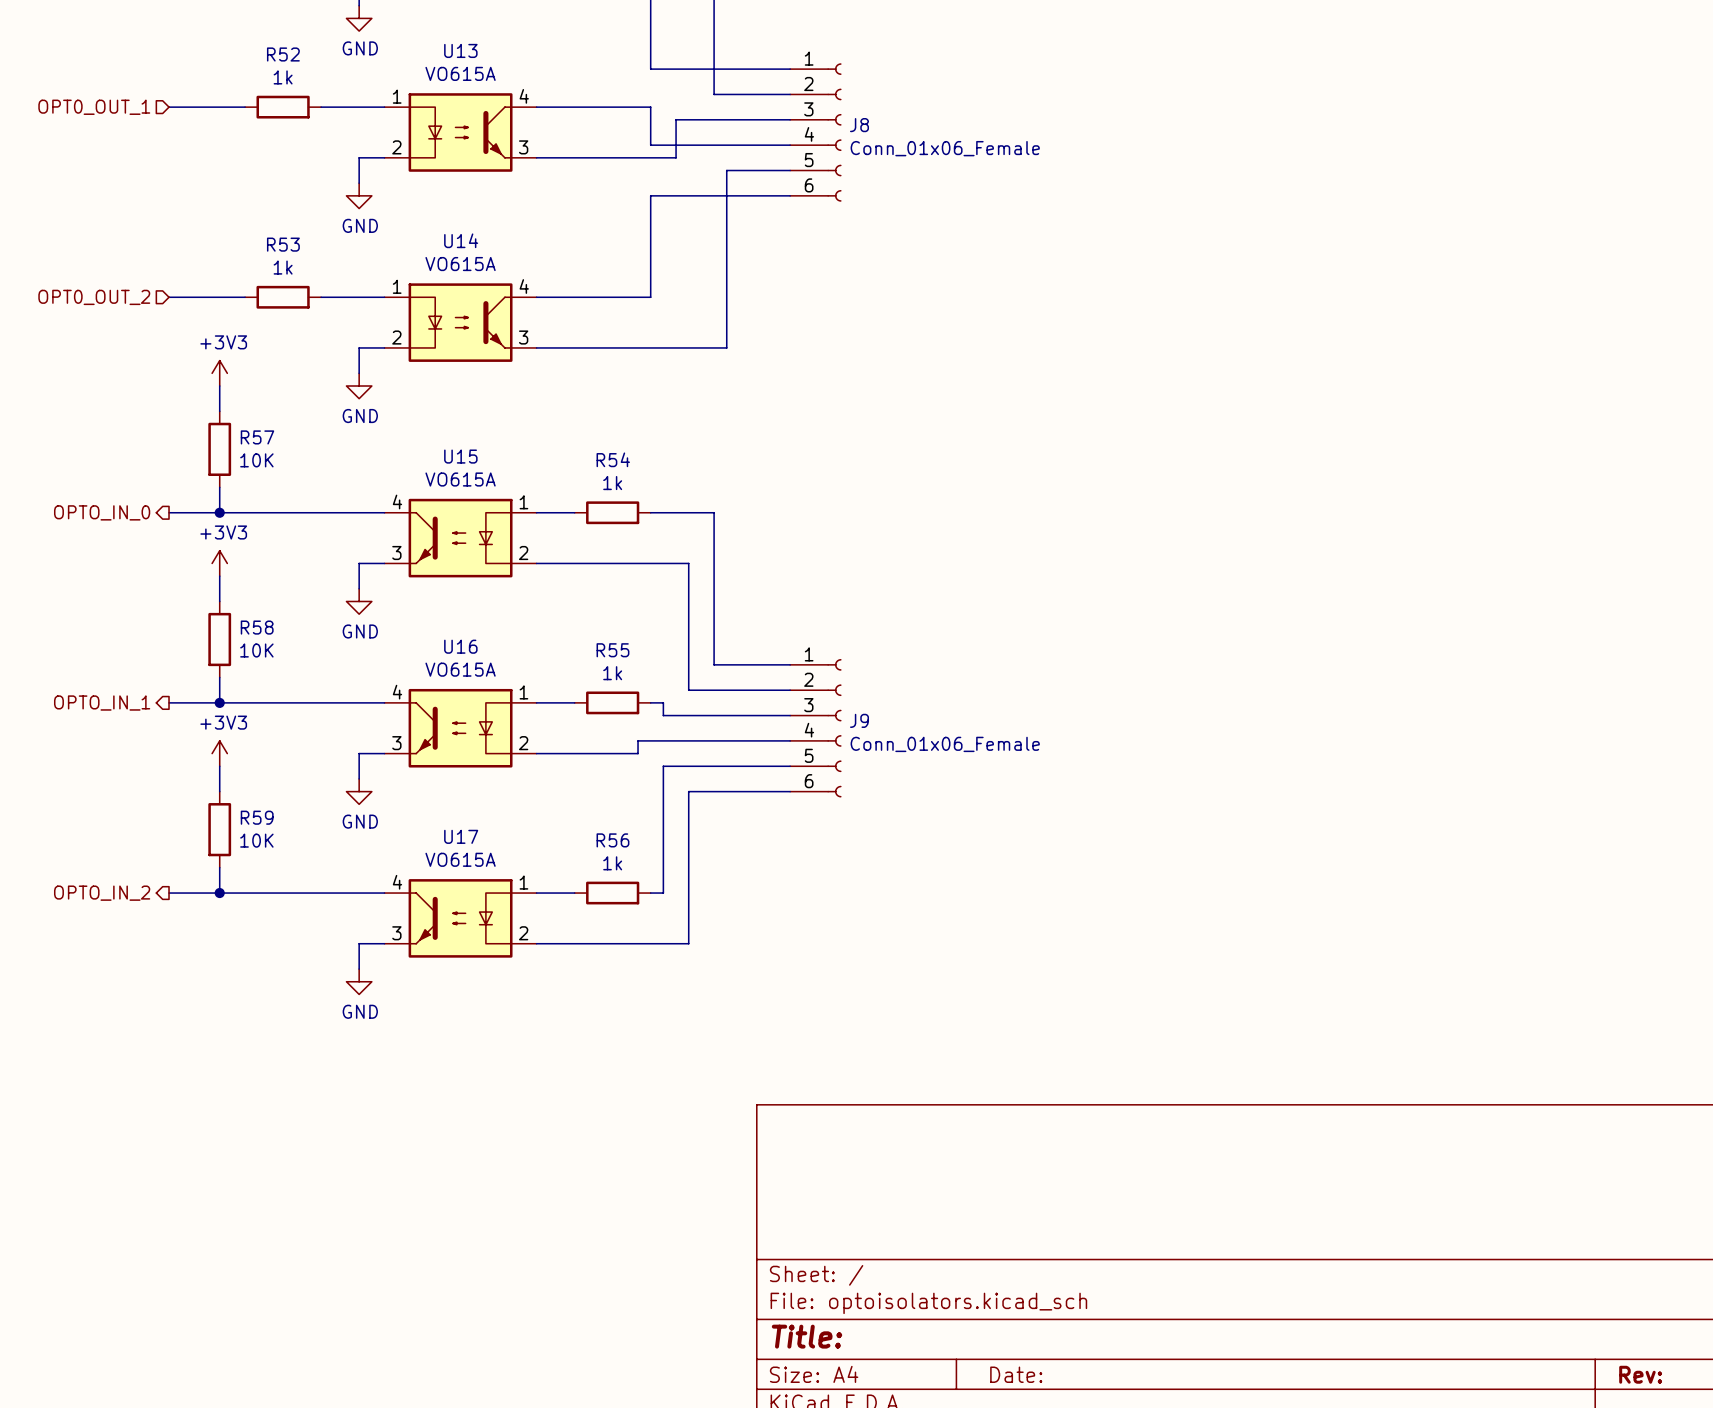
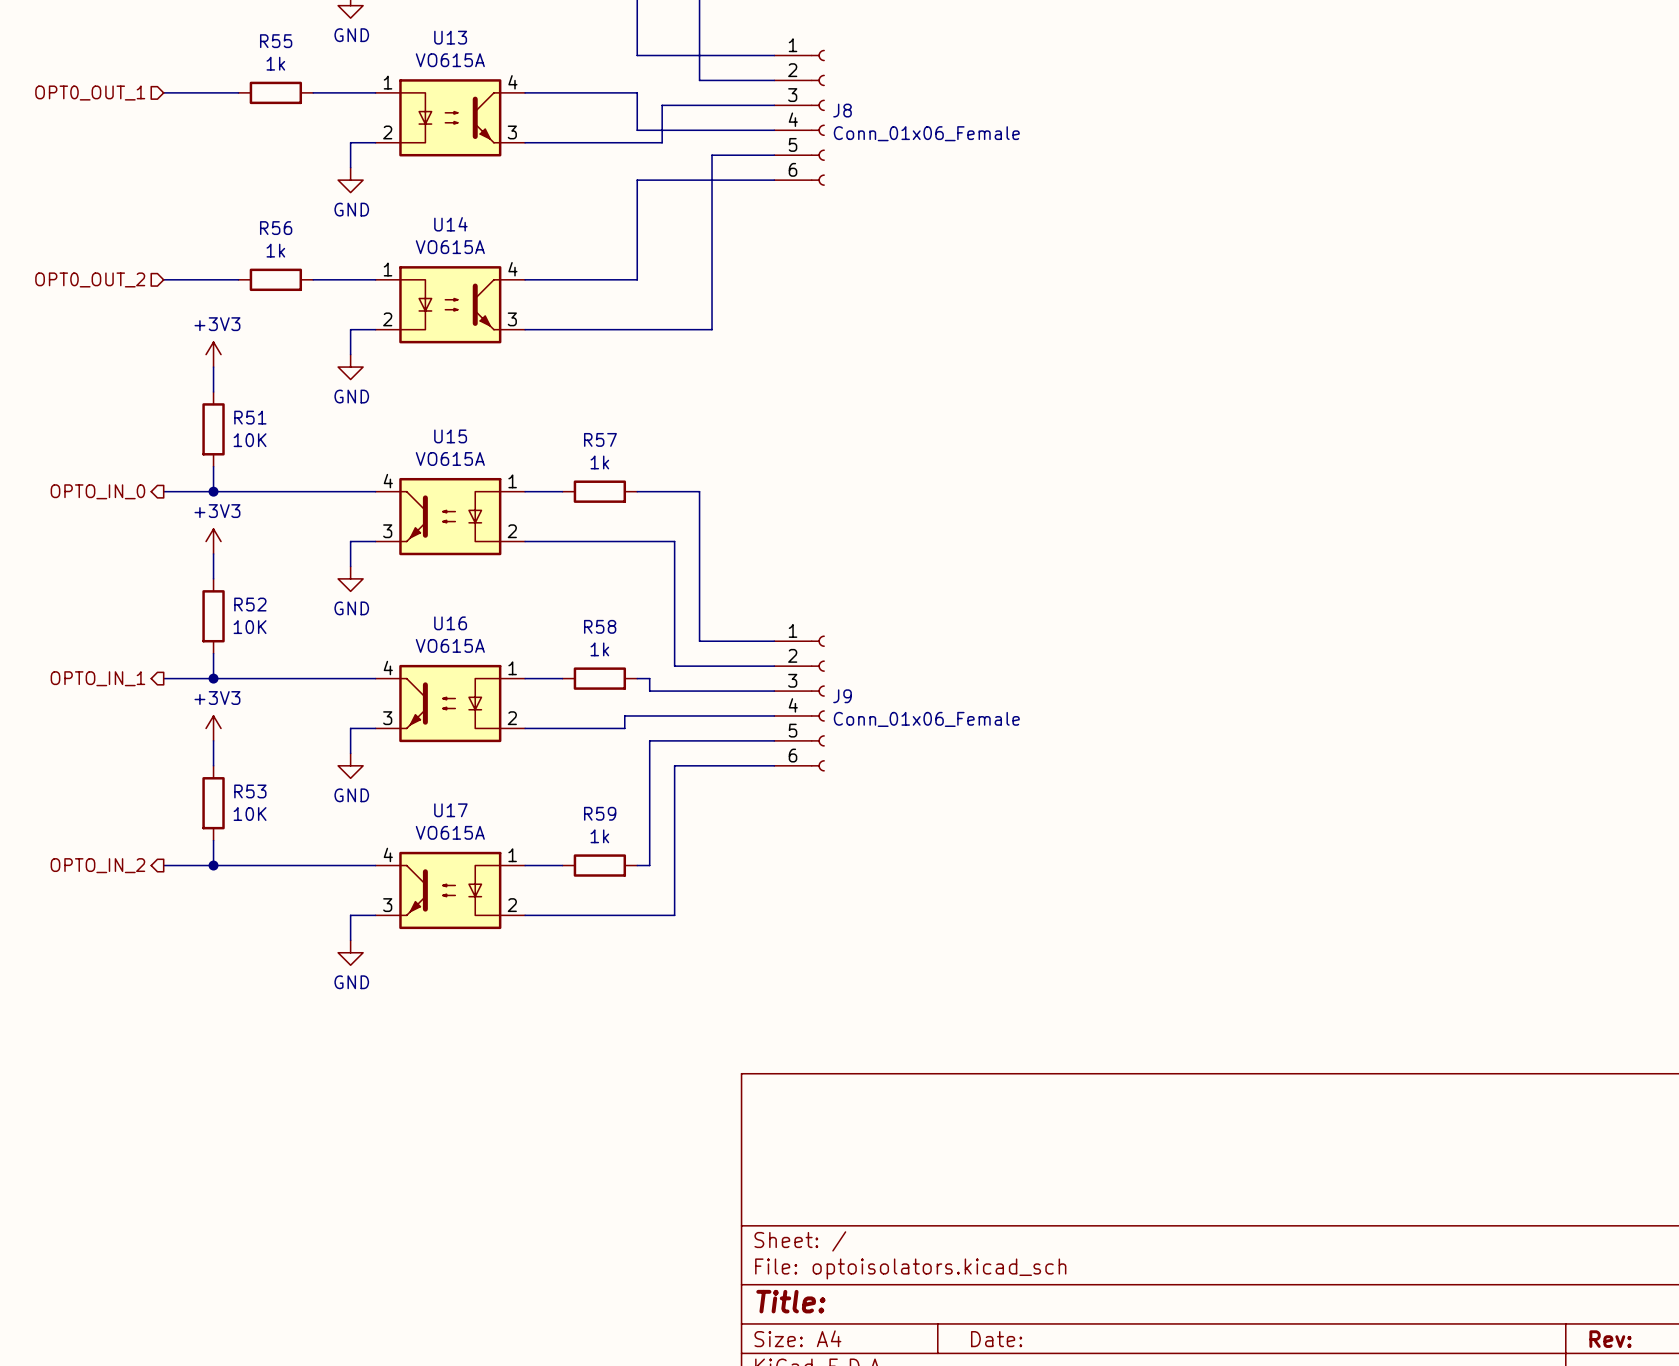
R52 name: R52 (283, 54) -> R55 (276, 41)
R53 name: R53 (283, 244) -> R56 (276, 228)
R57 name: R57 (257, 437) -> R51 (250, 417)
R54 name: R54 (613, 459) -> R57 (600, 439)
R58 name: R58 (257, 627) -> R52 (250, 604)
R55 name: R55 (612, 650) -> R58 (600, 626)
R59 name: R59 (257, 817) -> R53 (250, 791)
R56 name: R56 (612, 840) -> R59 (600, 813)

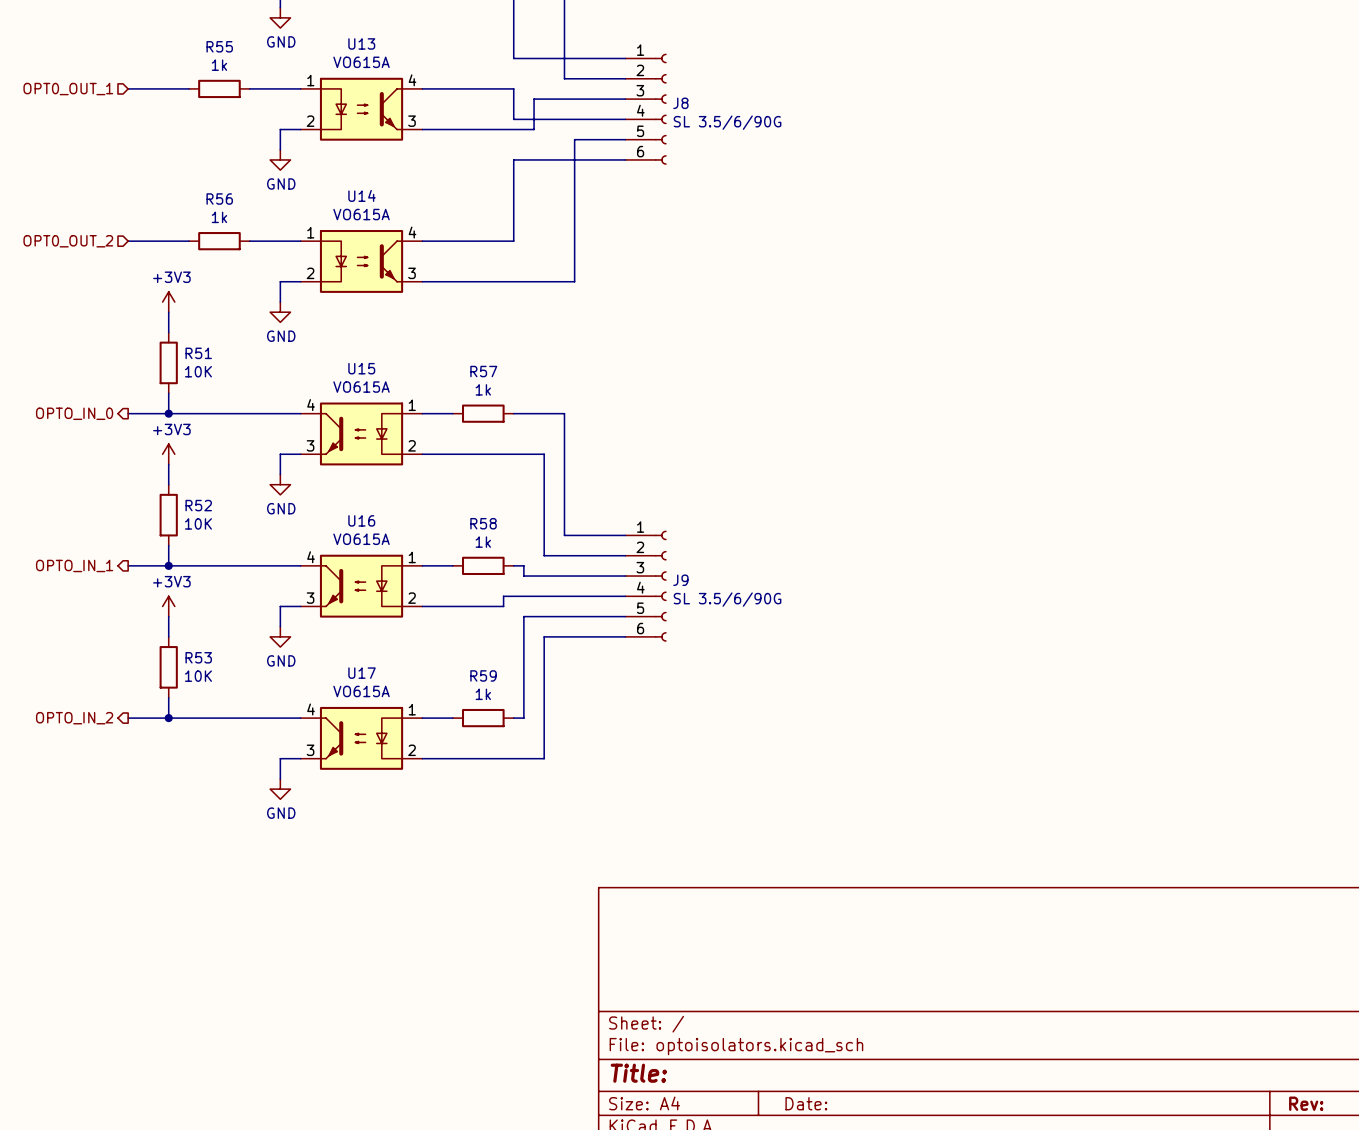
J8 value: Conn_01x06_Female (926, 133) -> SL 3.5/6/90G (727, 122)
J9 value: Conn_01x06_Female (926, 719) -> SL 3.5/6/90G (727, 599)

